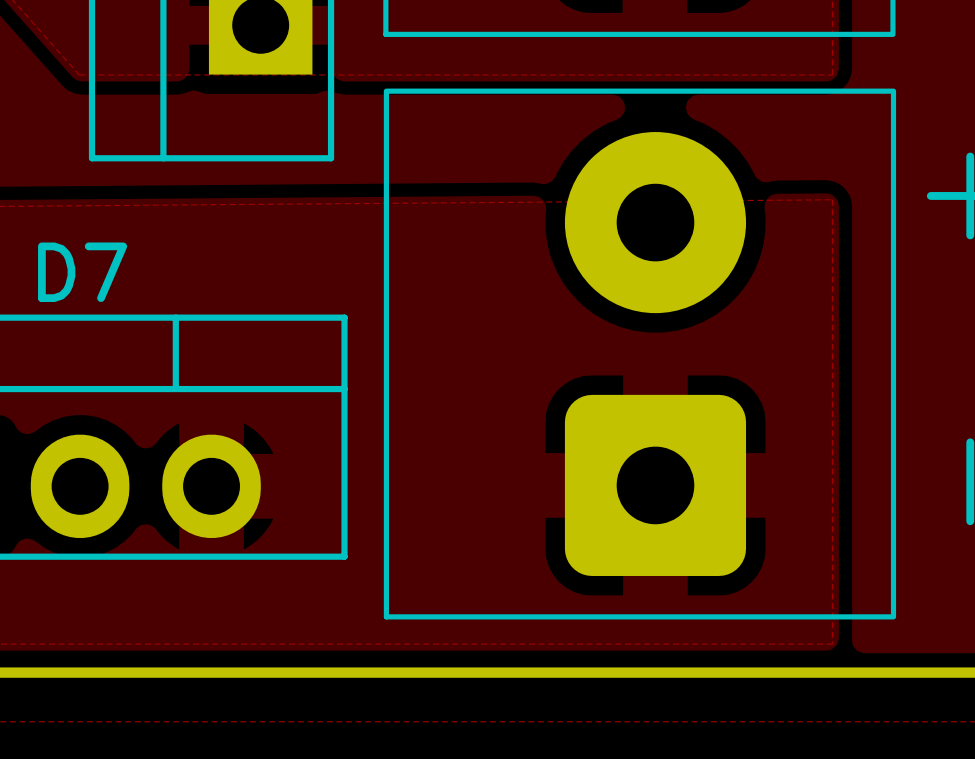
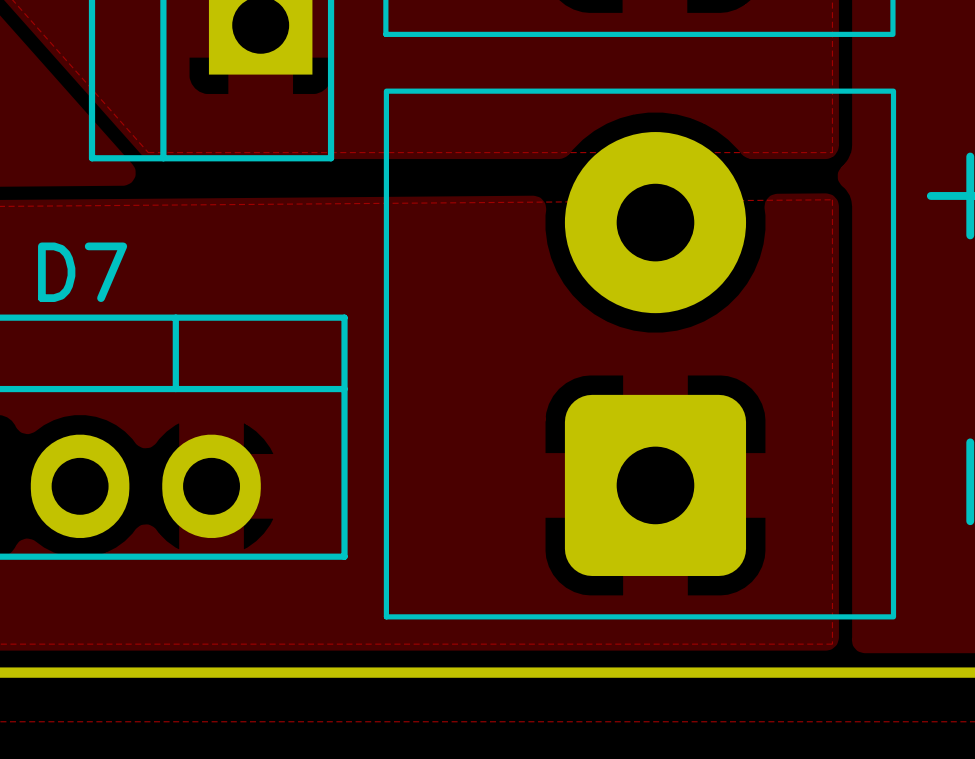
zone outline: (79, 74) (832, 74) -> (79, 74) (148, 152) (832, 152) (832, 74)

